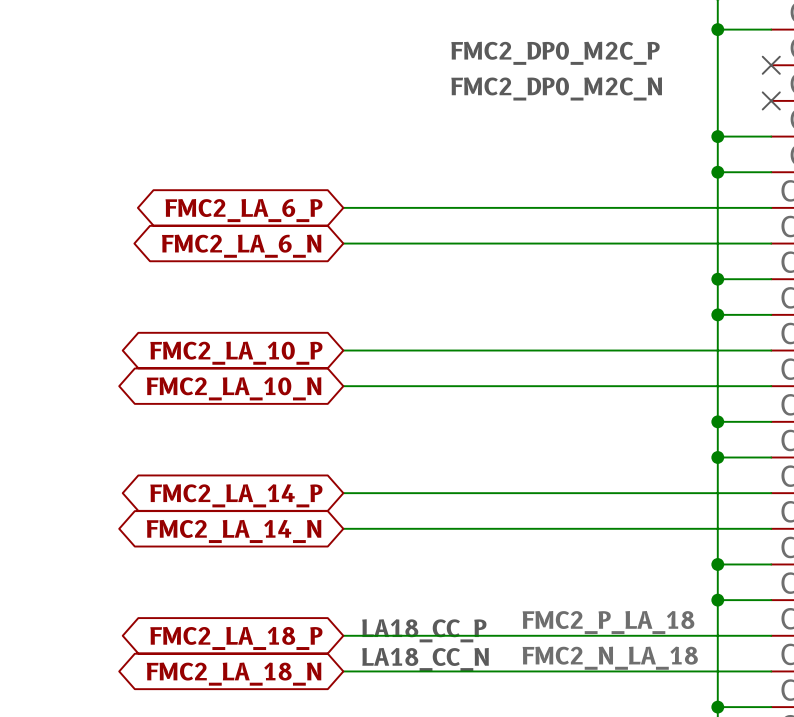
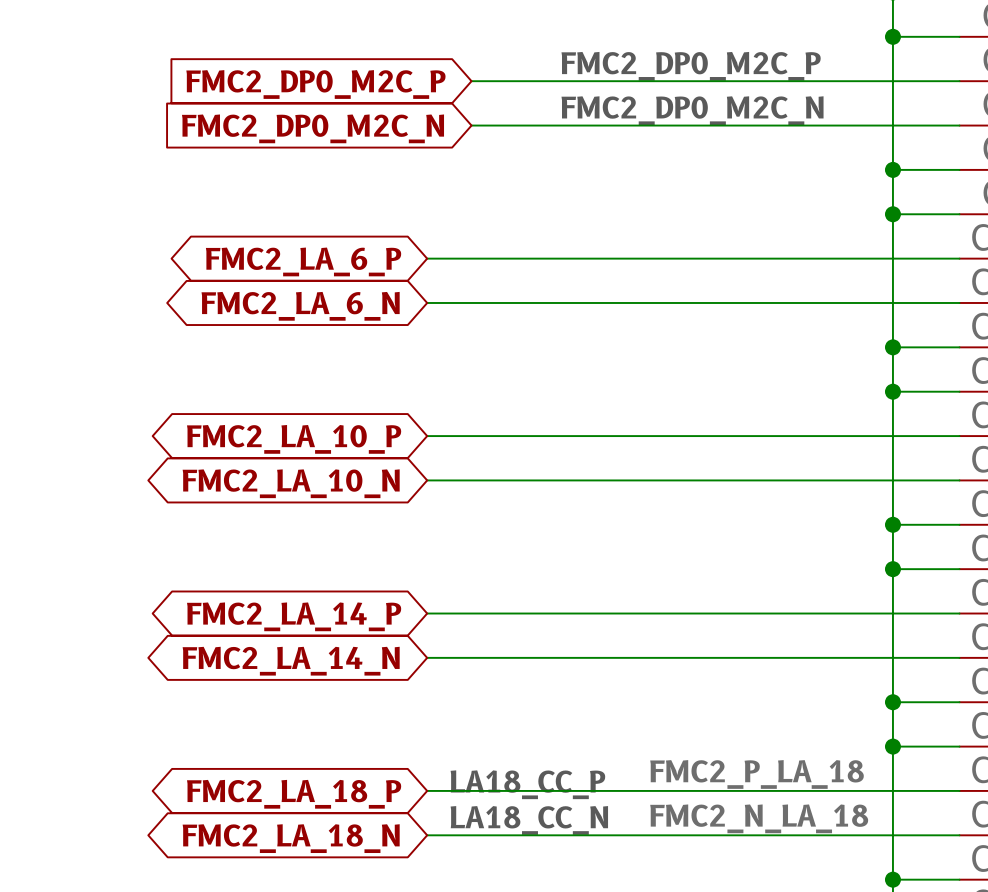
wire: none -> (471, 81) (959, 81)
no-connect mark: (771, 65) -> none
global label: none -> FMC2_DP0_M2C_P (315, 84)
wire: none -> (471, 125) (959, 125)
no-connect mark: (771, 100) -> none
global label: none -> FMC2_DP0_M2C_N (313, 128)

